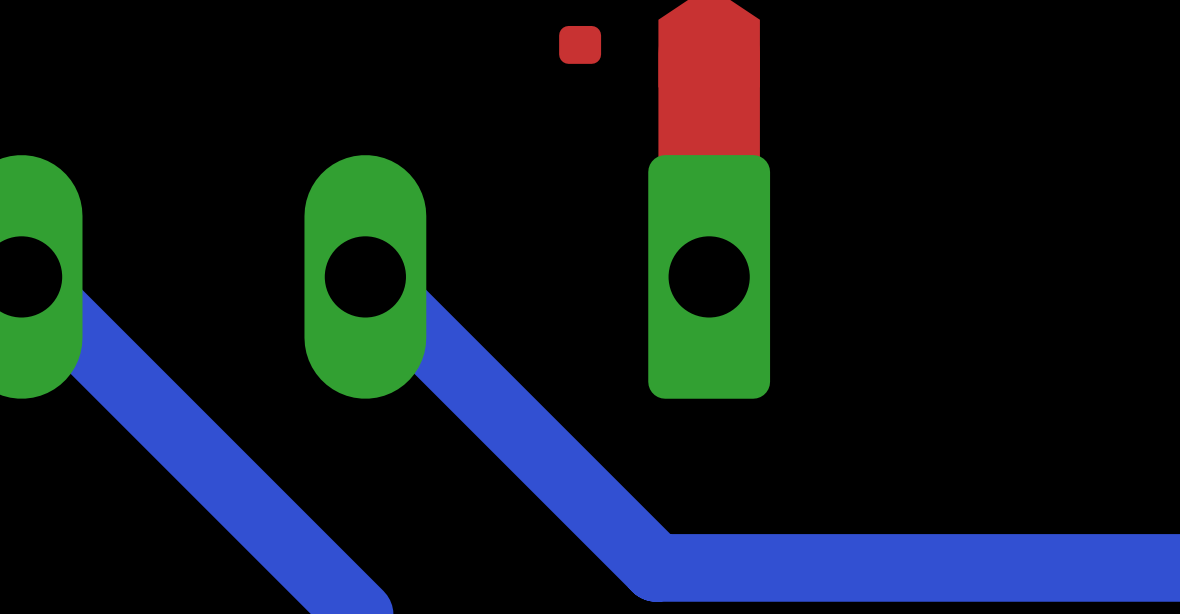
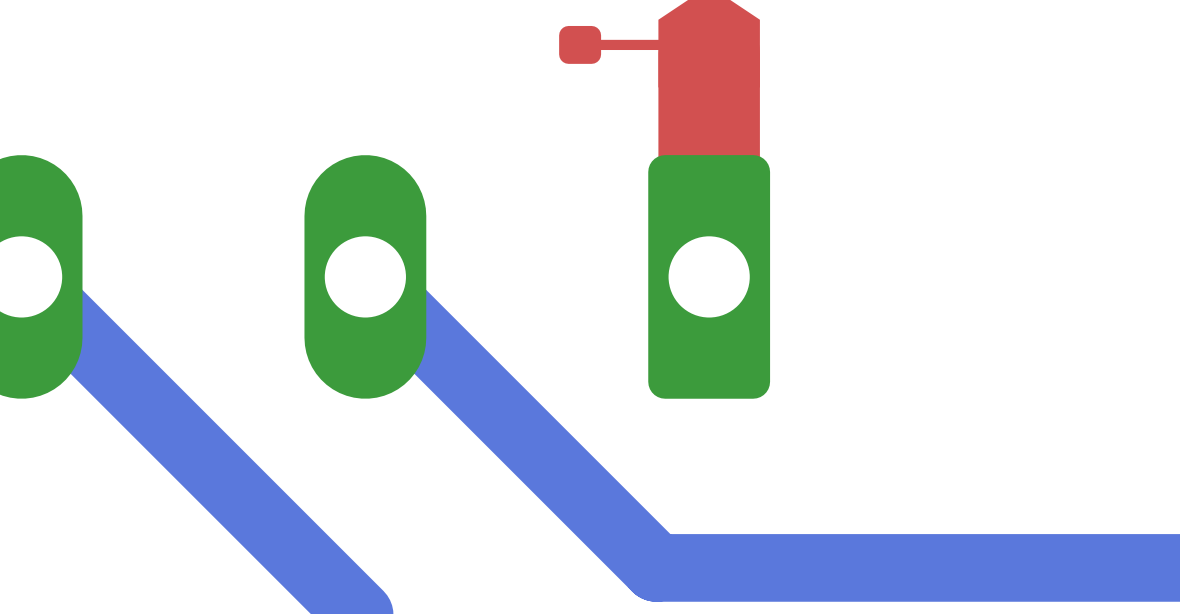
top track: none -> (580, 44) (700, 44) (709, 53)

